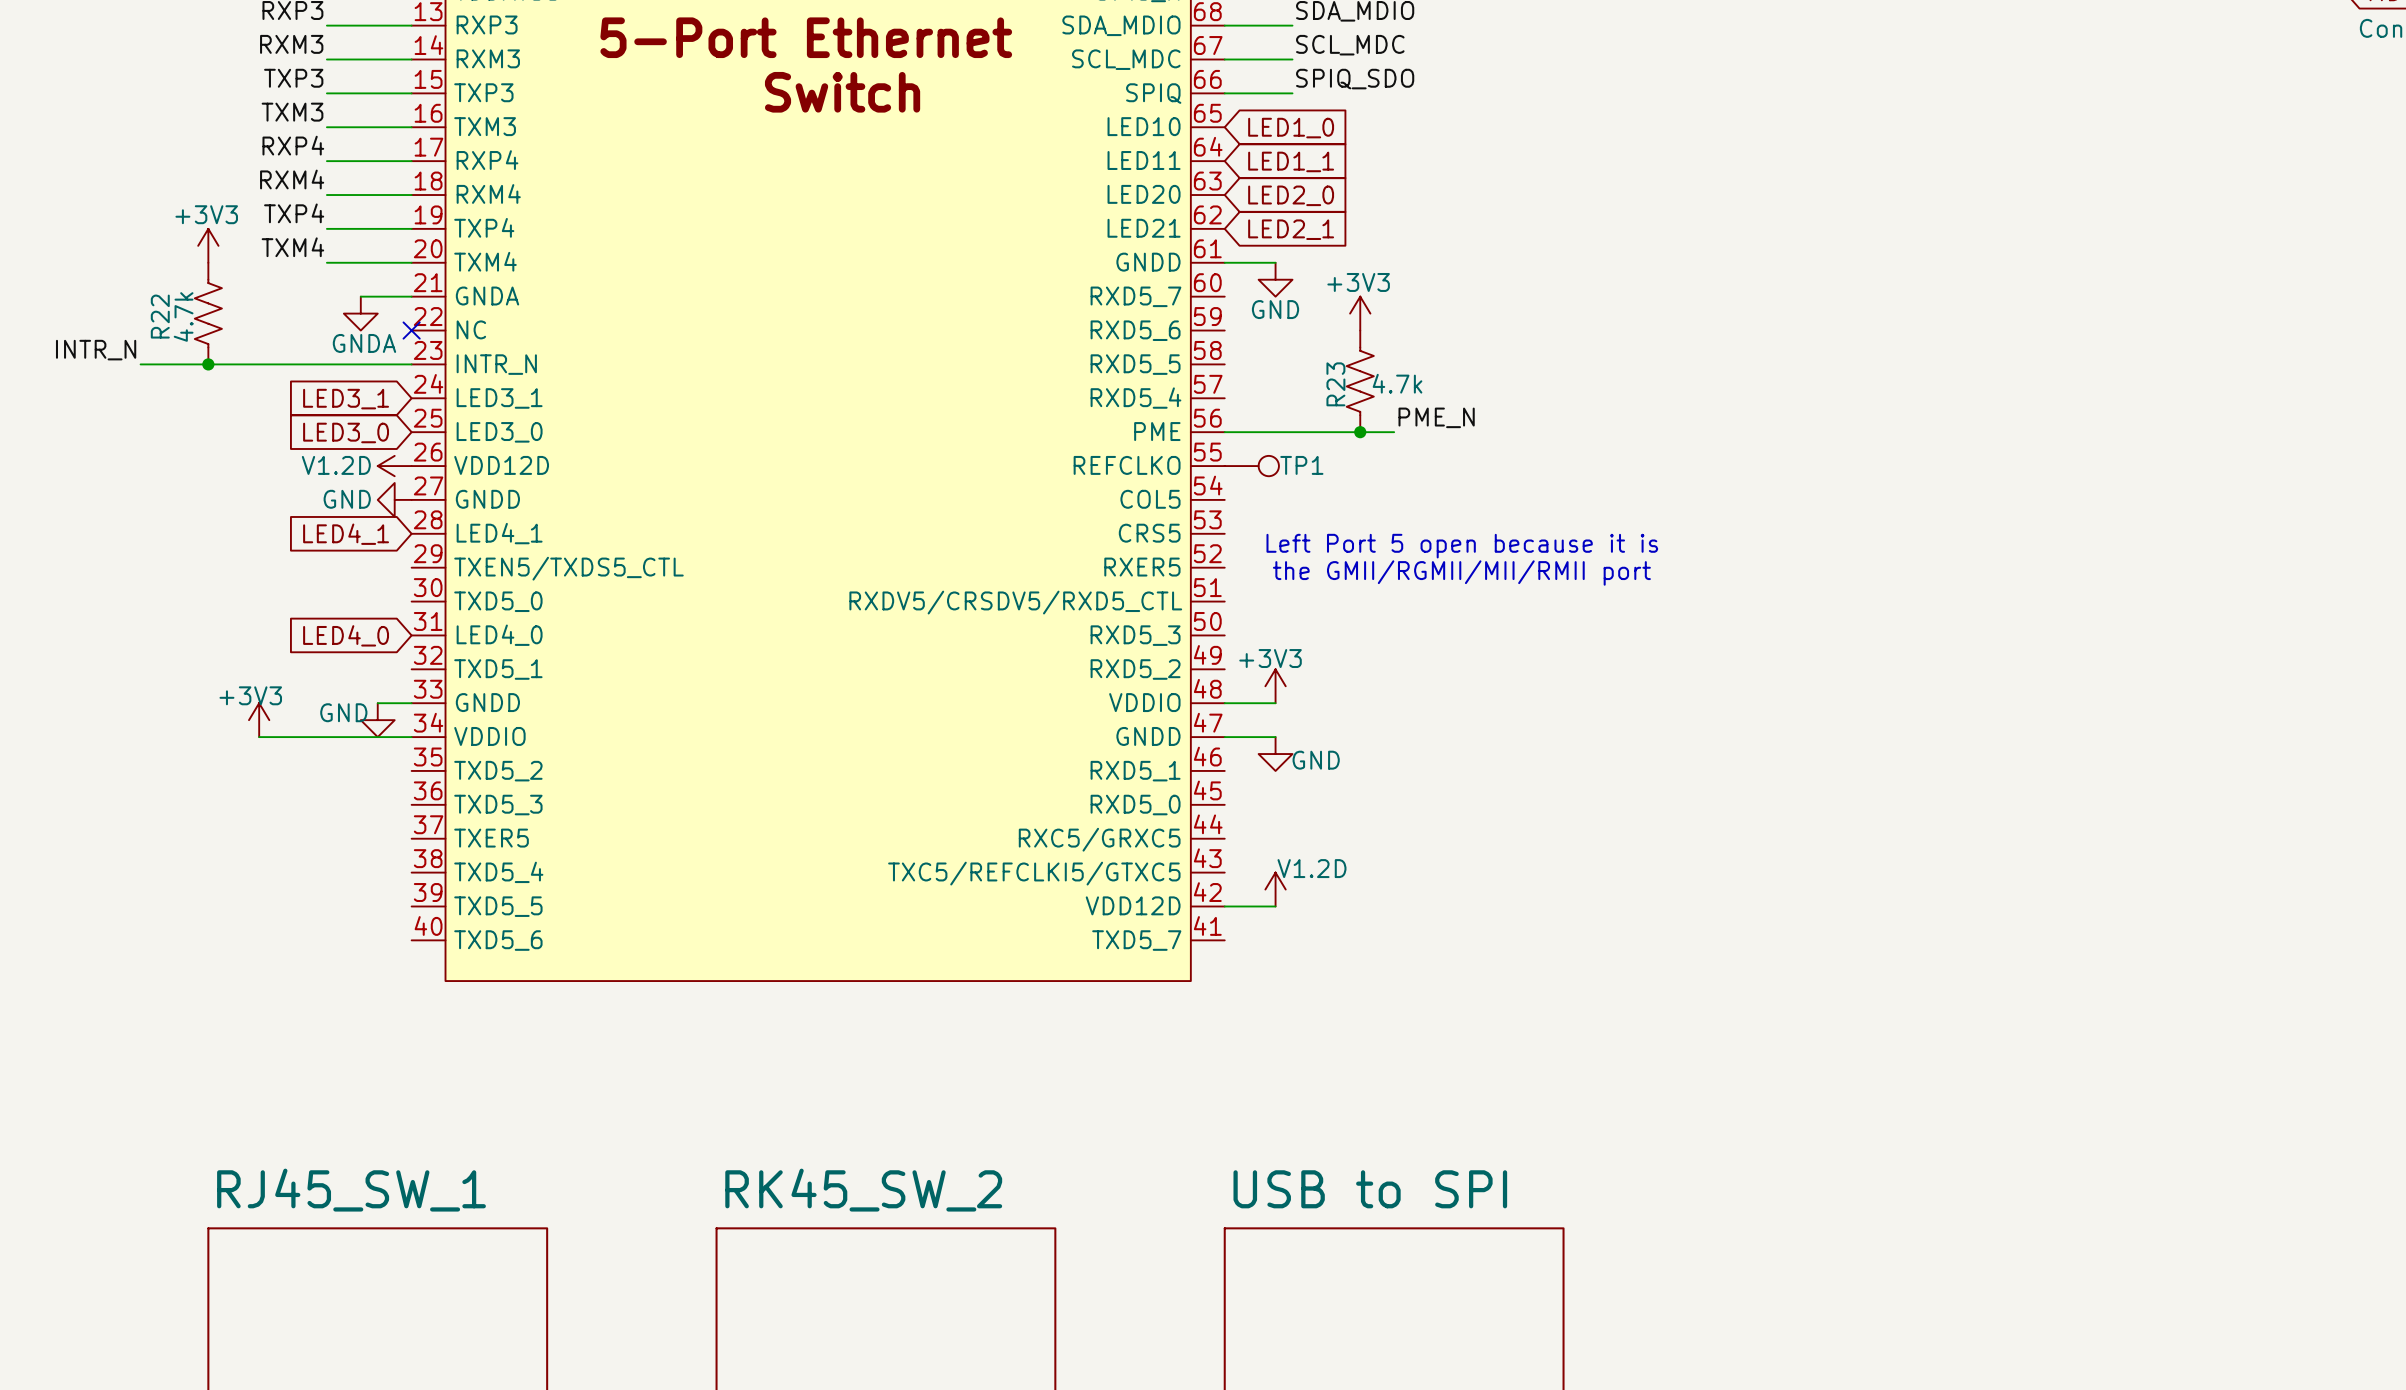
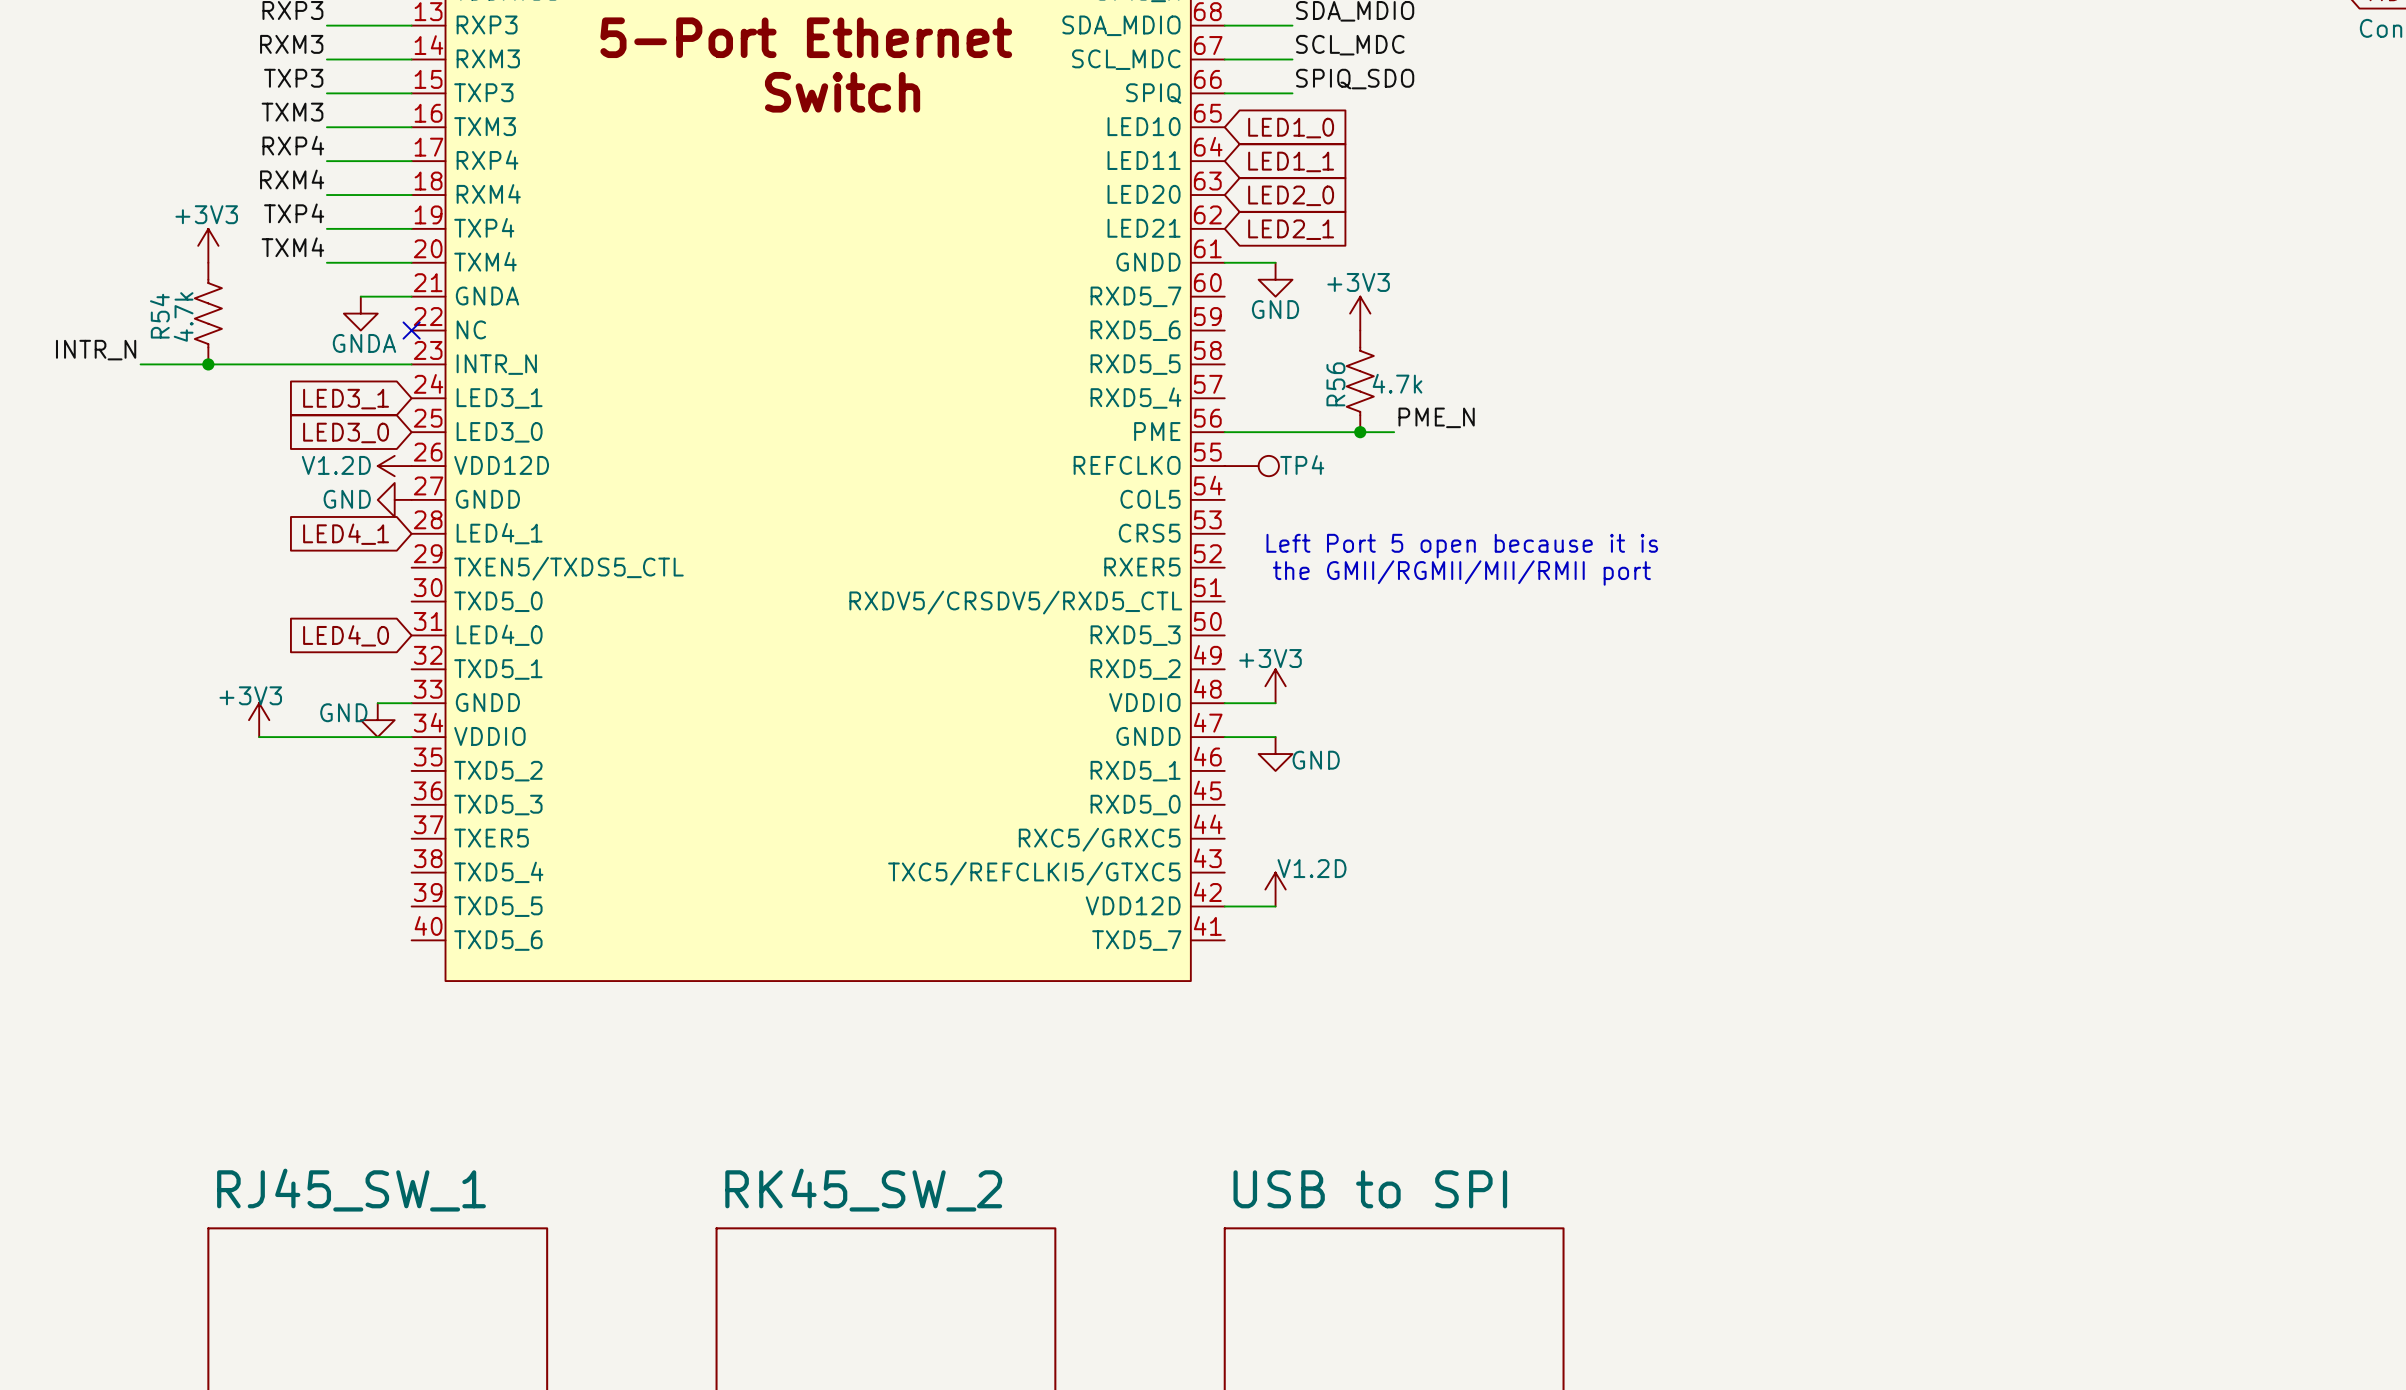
R22 name: R22 (160, 316) -> R54 (159, 316)
R23 name: R23 (1335, 384) -> R56 (1335, 384)
TP1 name: TP1 (1301, 465) -> TP4 (1302, 465)

